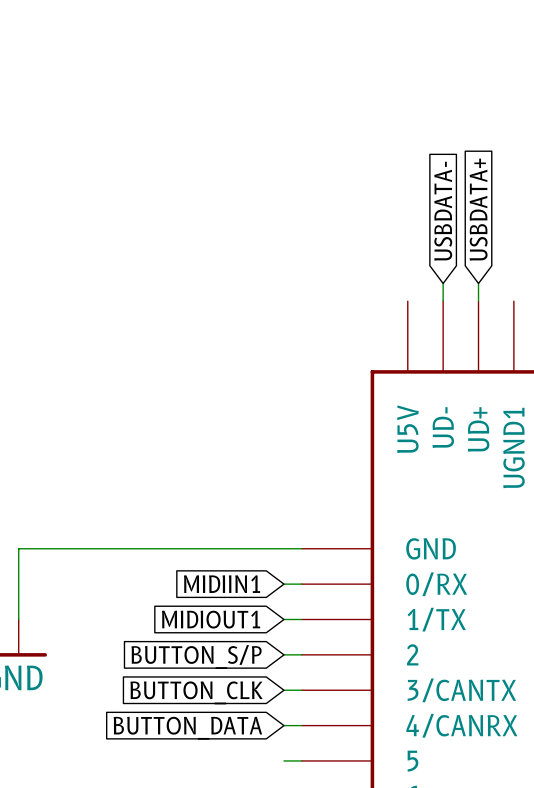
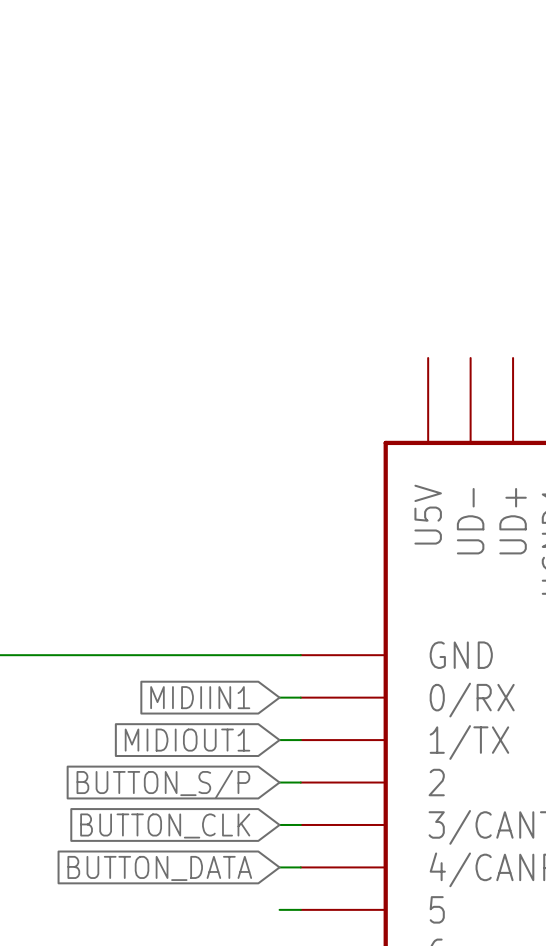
global label: USBDATA+ (478, 209) -> none
global label: USBDATA- (443, 211) -> none
wire: (443, 283) (443, 301) -> none
wire: (478, 283) (478, 301) -> none

